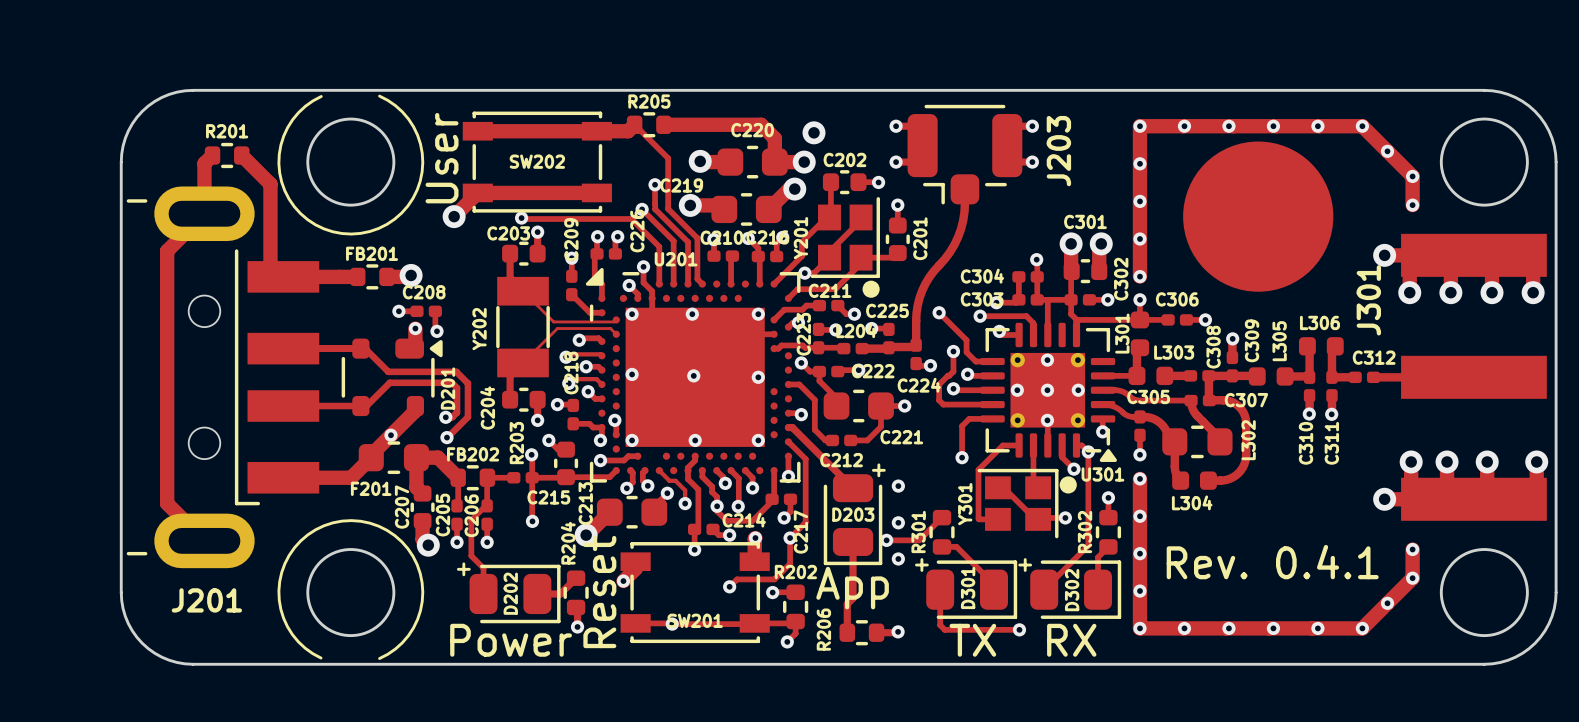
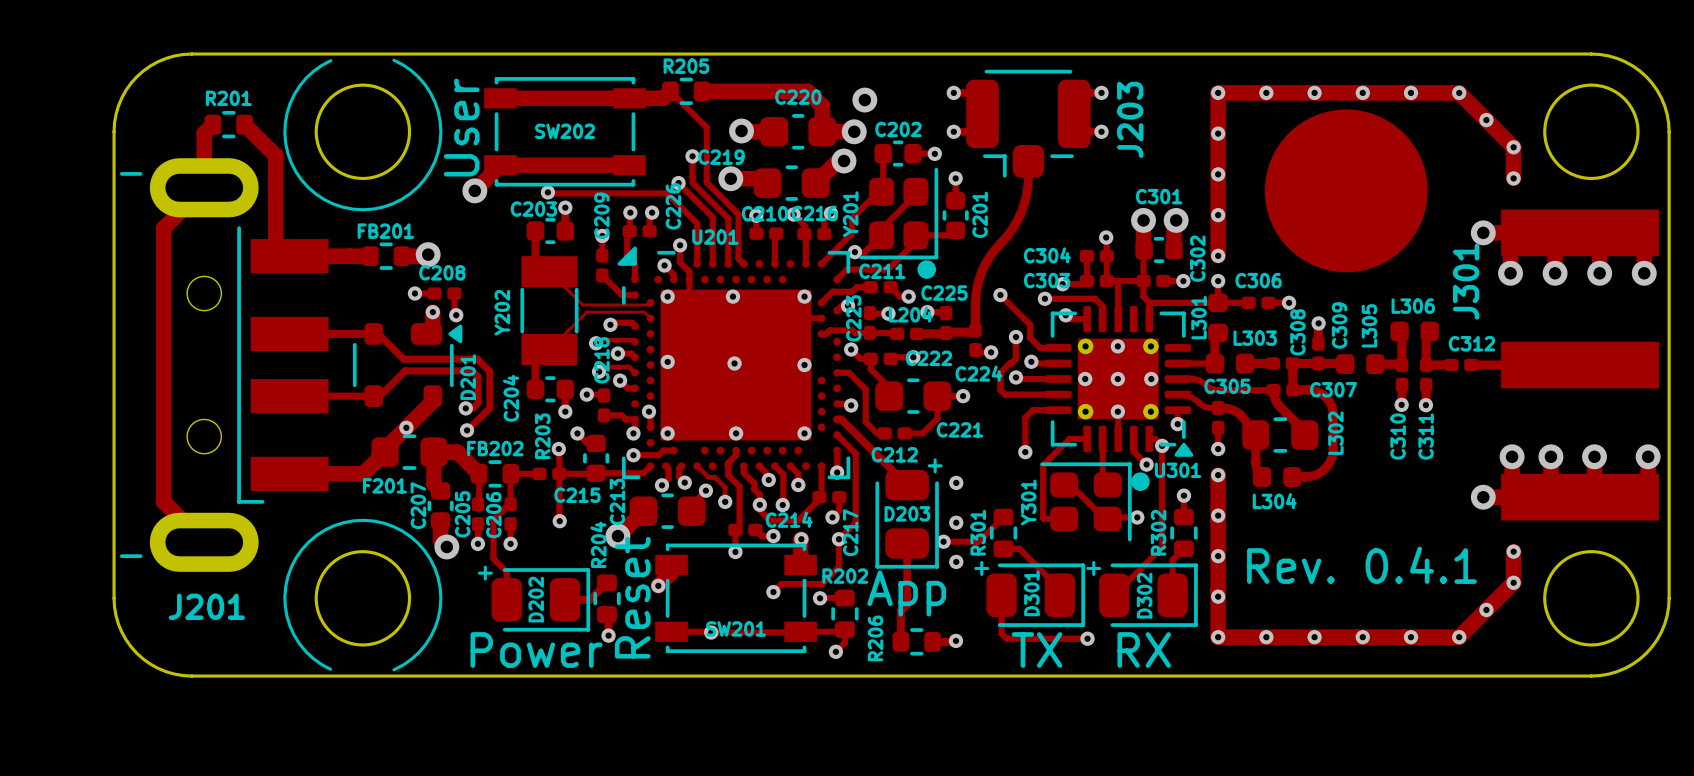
Y201 footprint: [810, 197, 881, 279] -> [859, 167, 939, 260]
Y301 footprint: [977, 468, 1059, 539] -> [1040, 462, 1132, 542]

